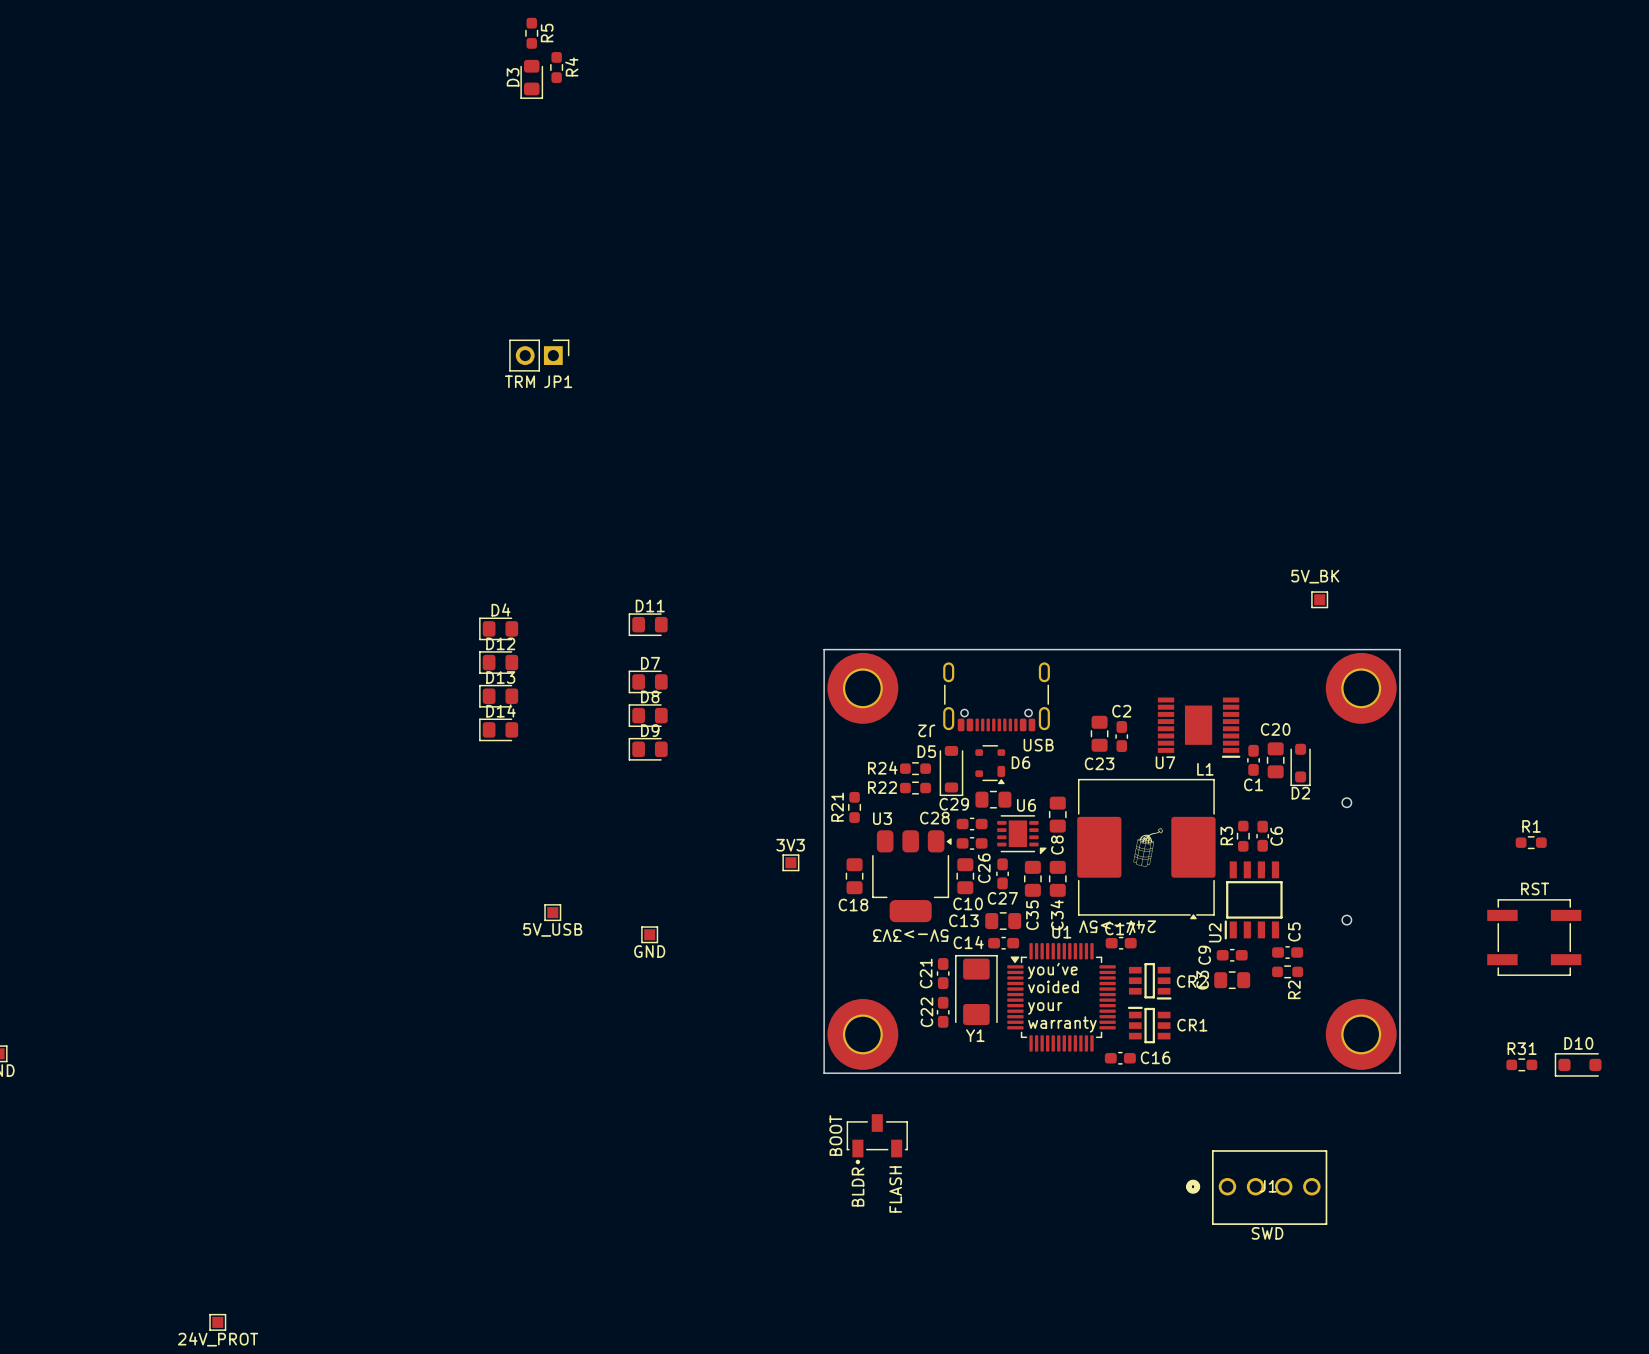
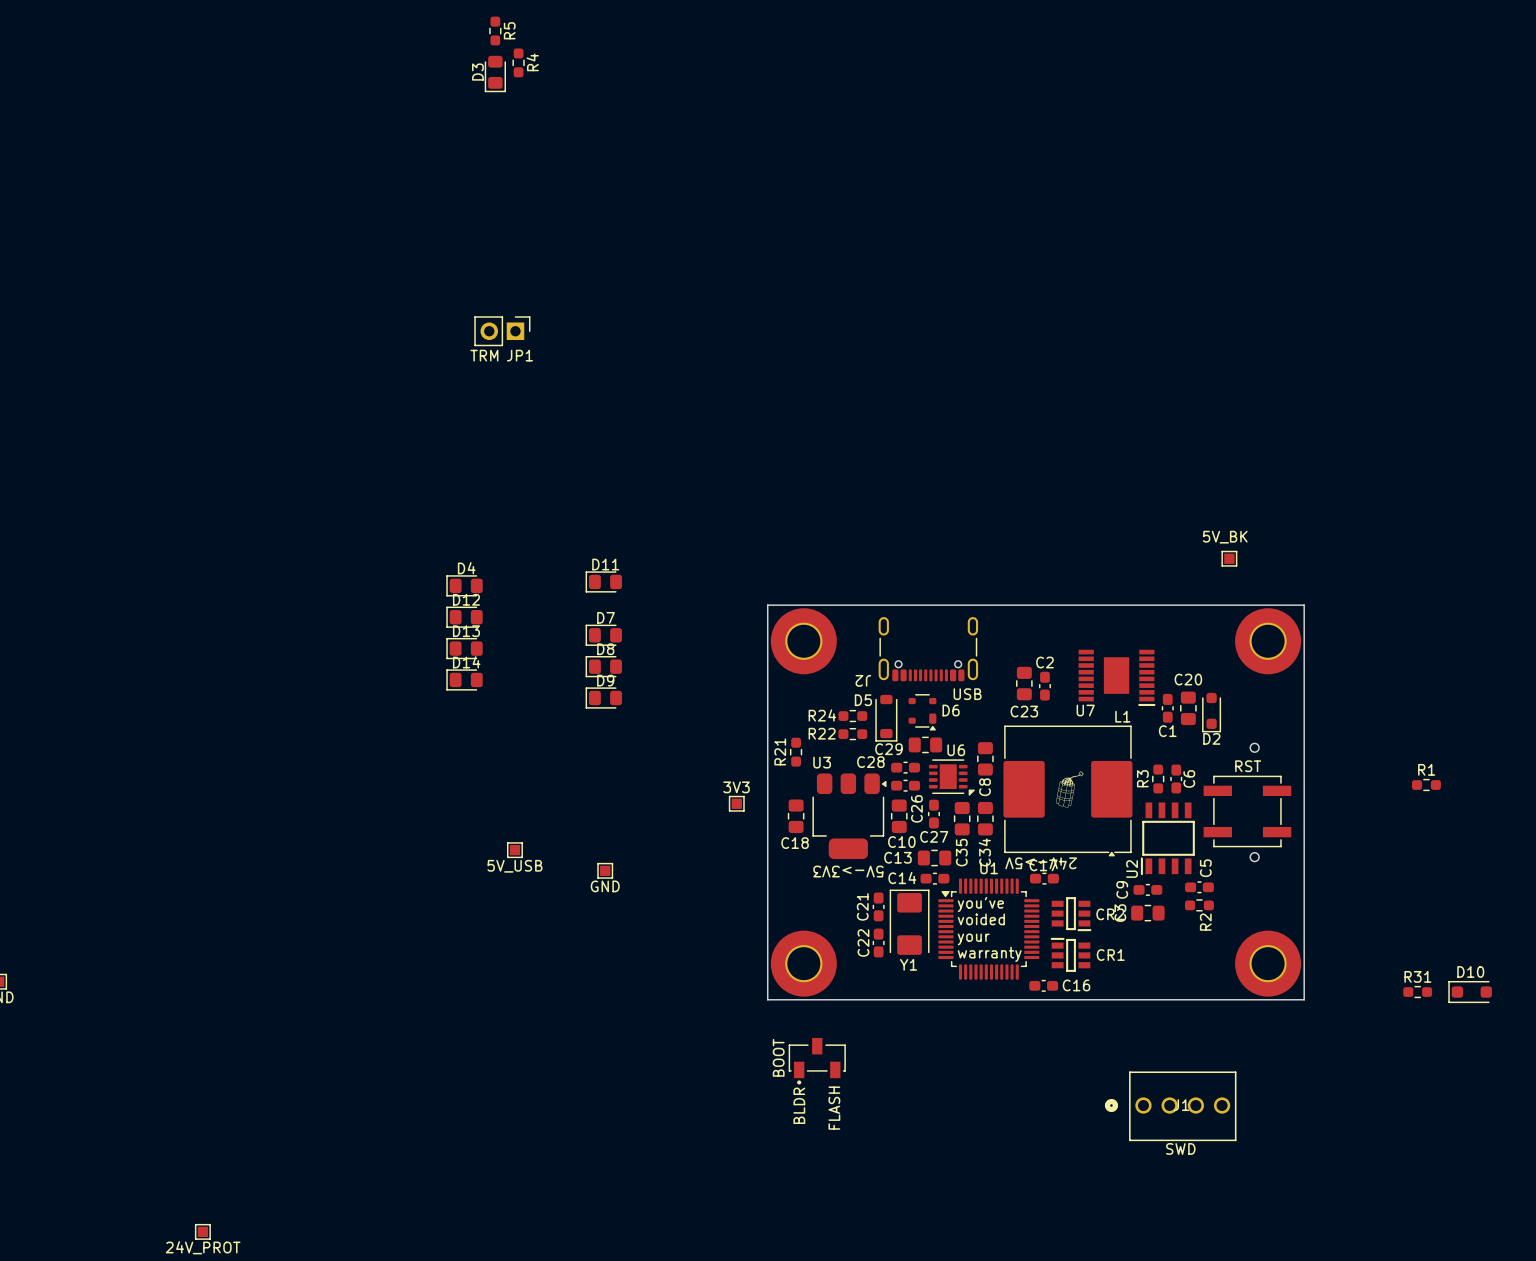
part position: (1534, 937) -> (1247, 811)

